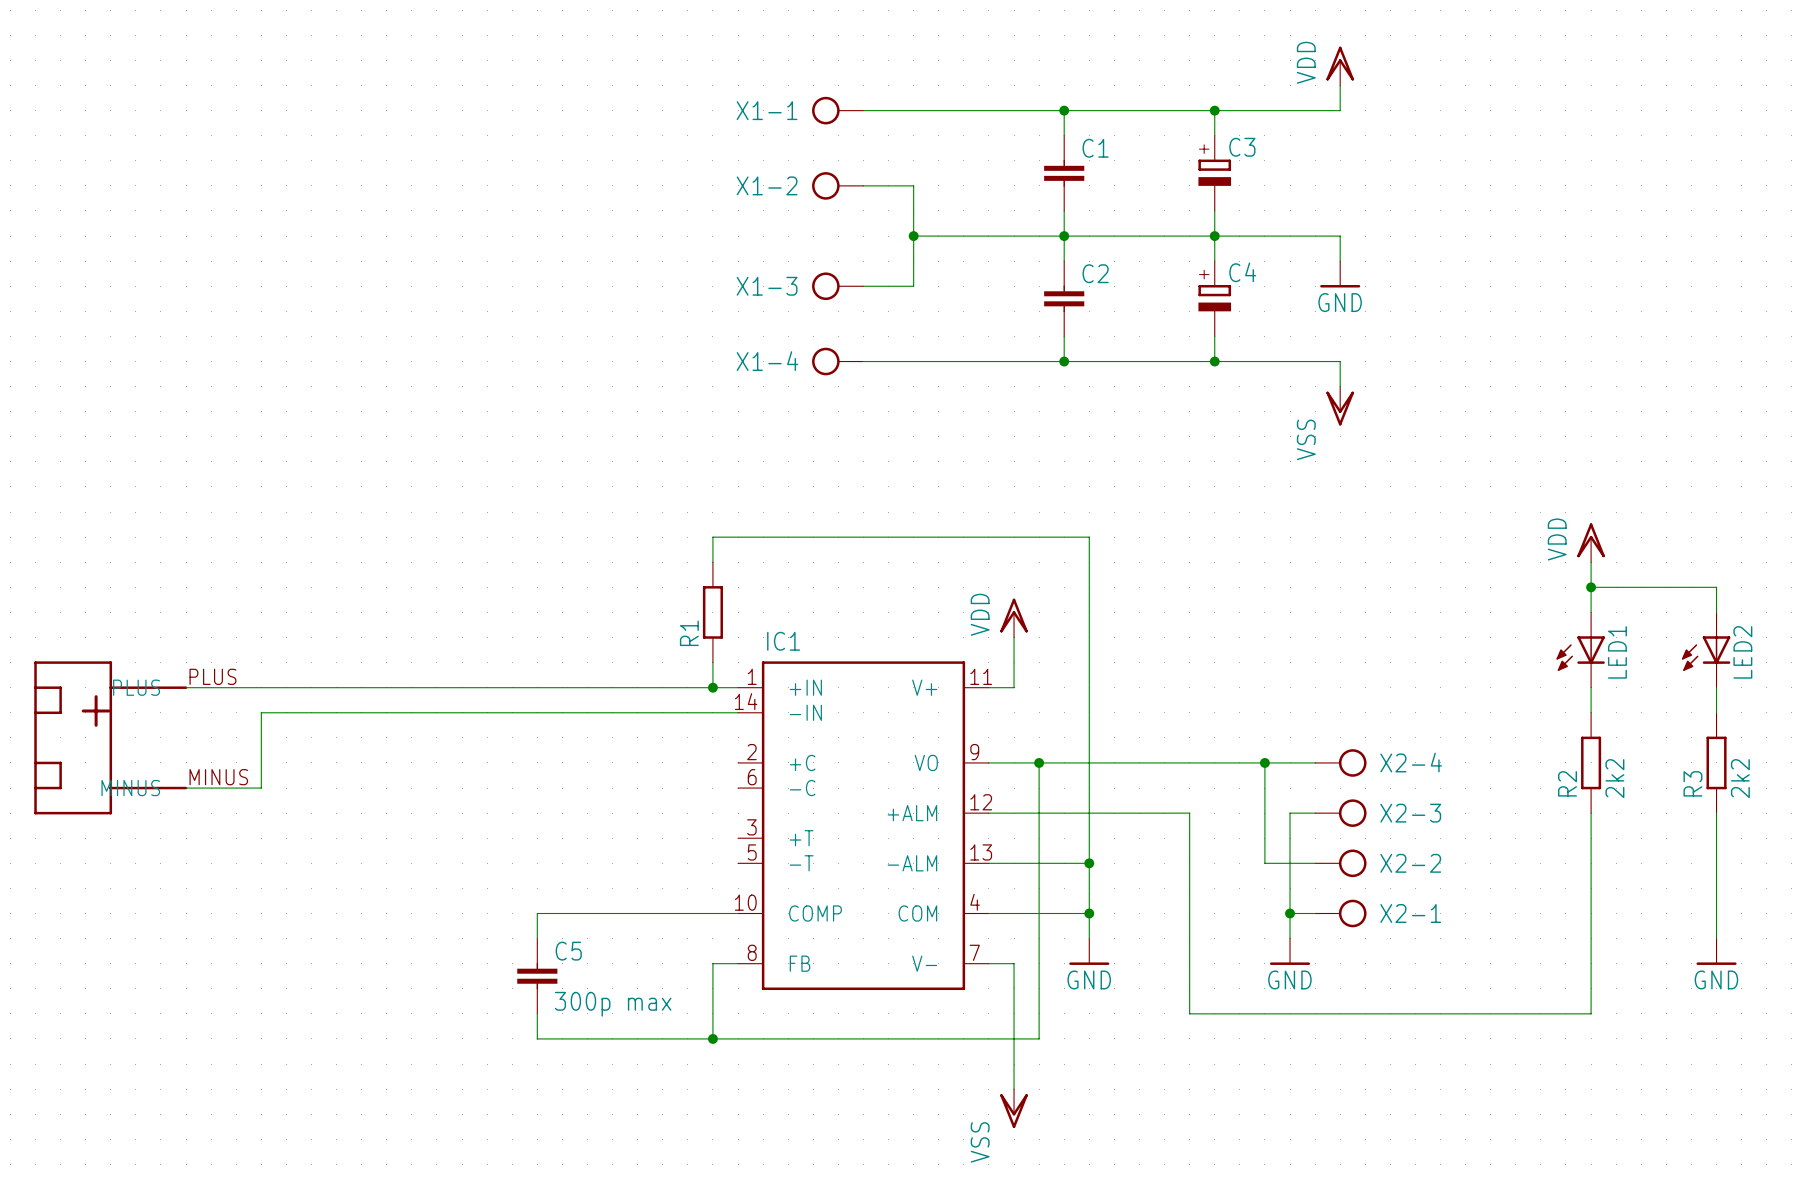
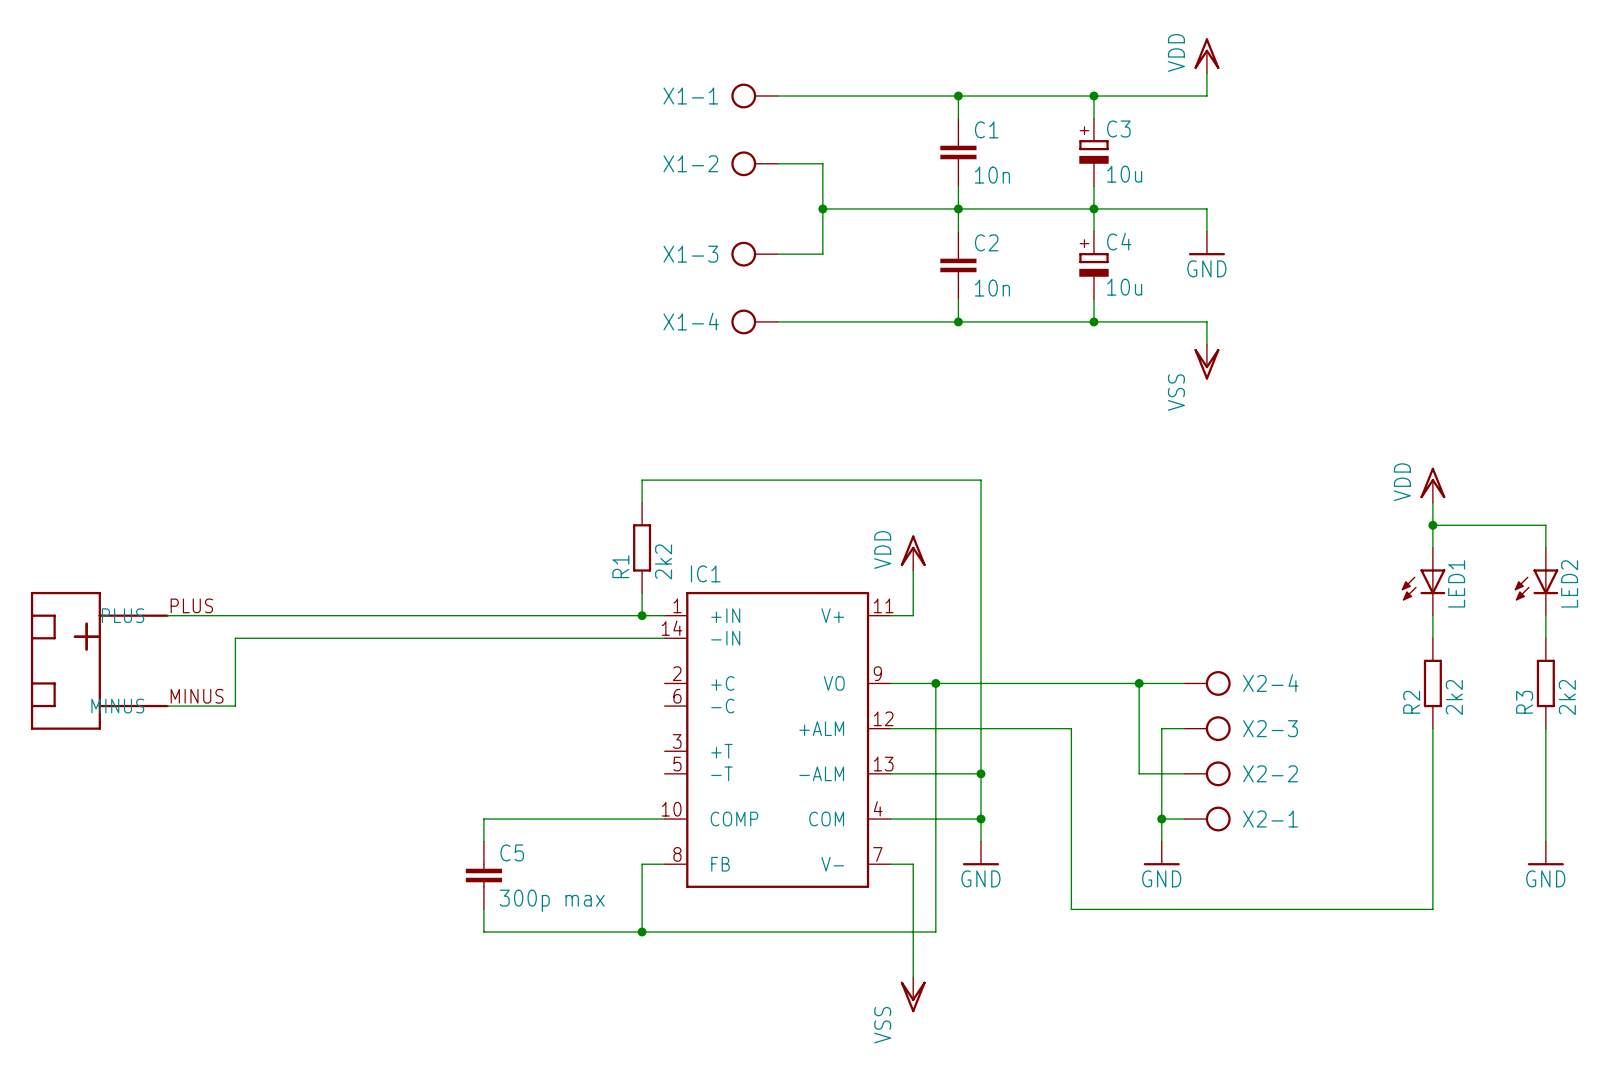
C3 value: none -> 10u (1124, 174)
C1 value: none -> 10n (992, 175)
C4 value: none -> 10u (1124, 287)
C2 value: none -> 10n (992, 288)
R1 value: none -> 2k2 (663, 561)

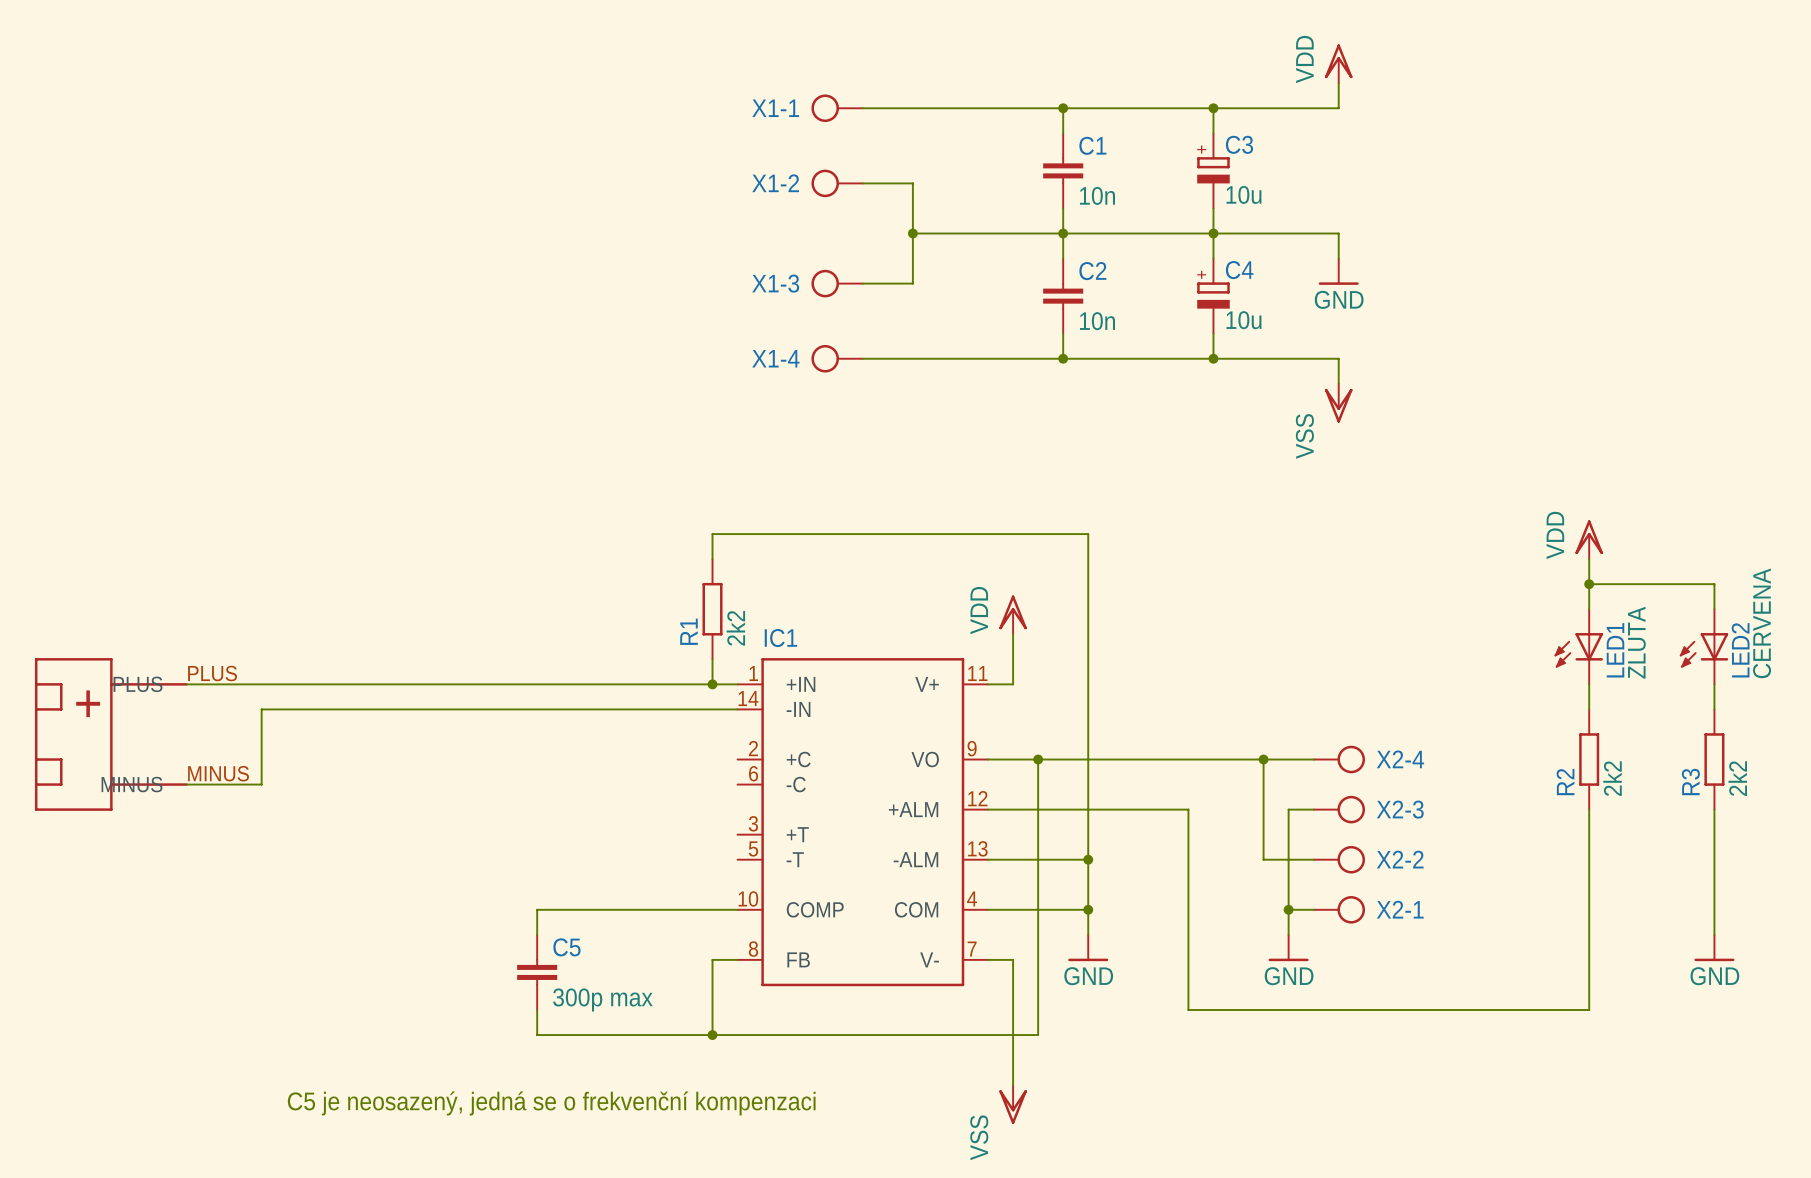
LED2 value: none -> CERVENA (1762, 623)
LED1 value: none -> ZLUTA (1636, 642)
text: none -> C5 je neosazený, jedná se o frekvenční kompenzaci (551, 1103)

